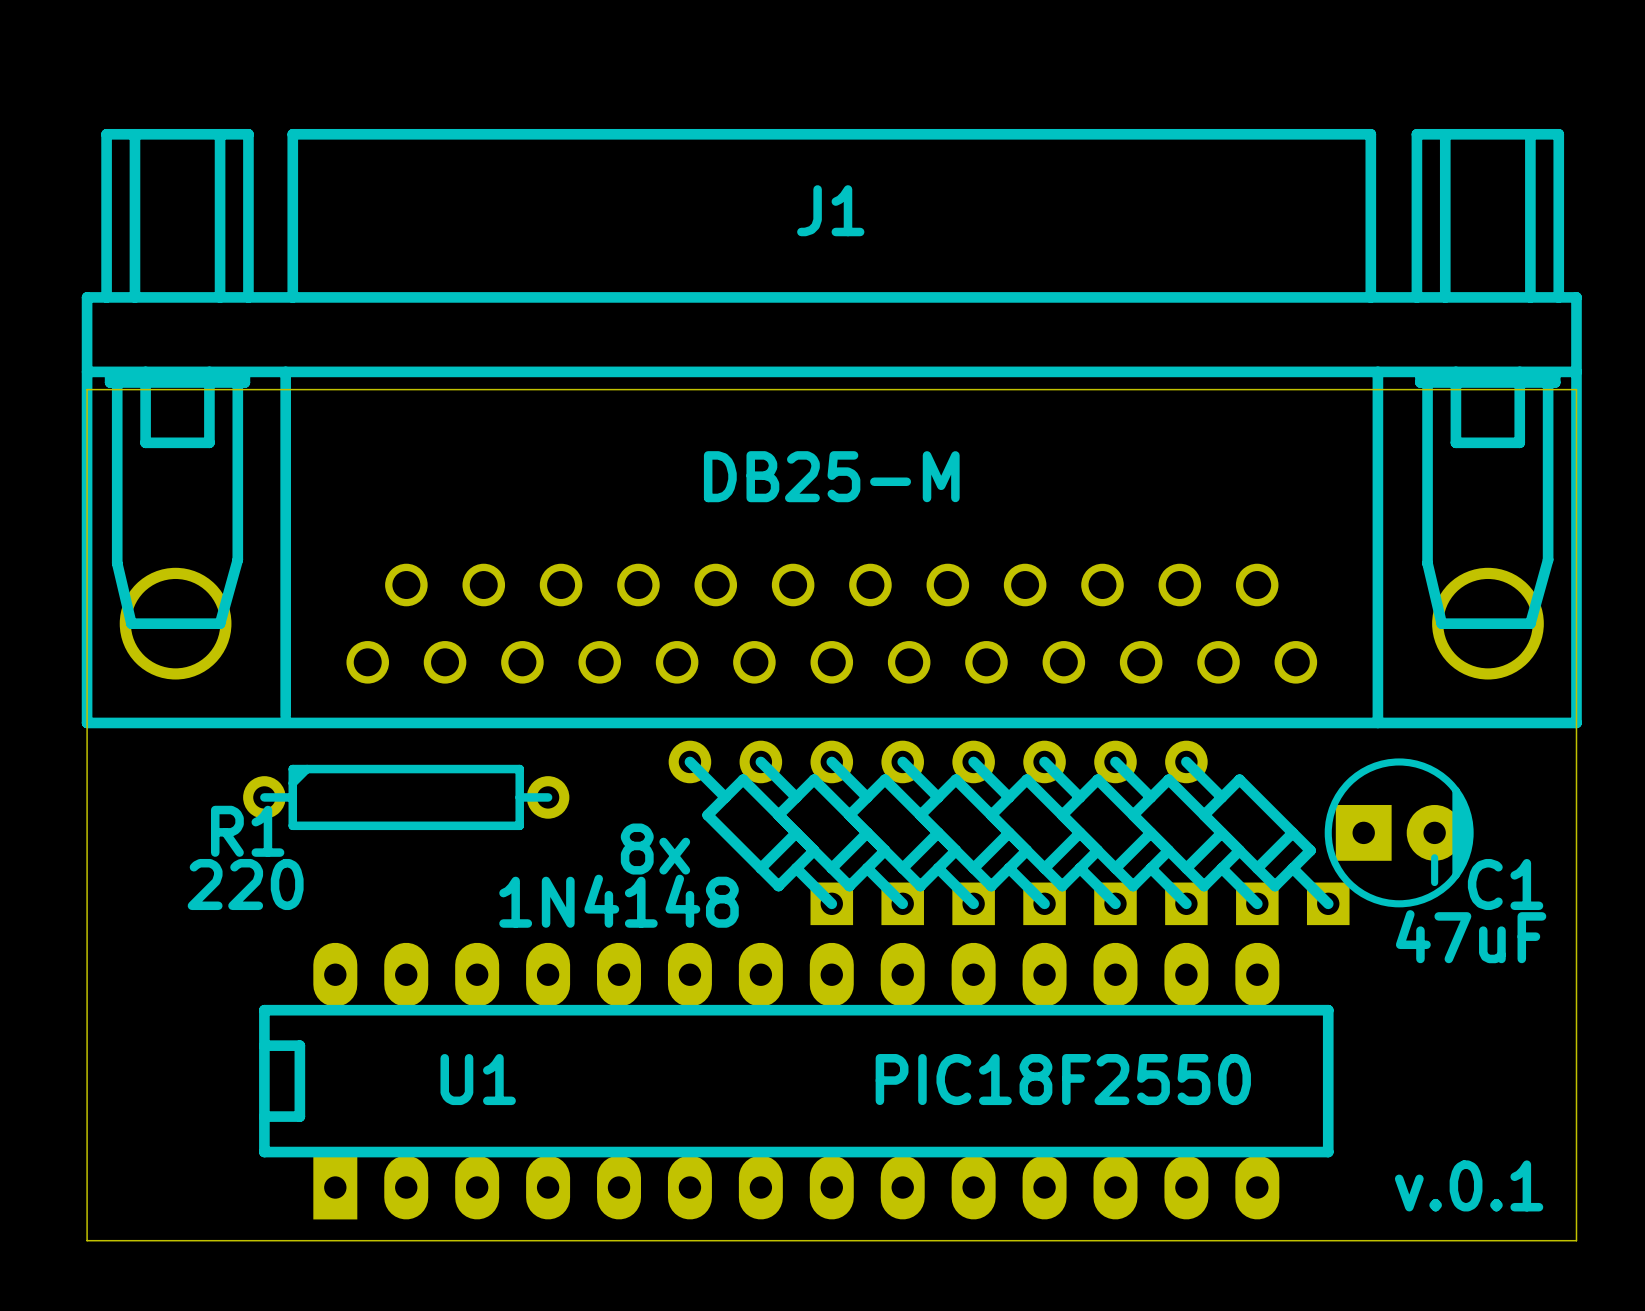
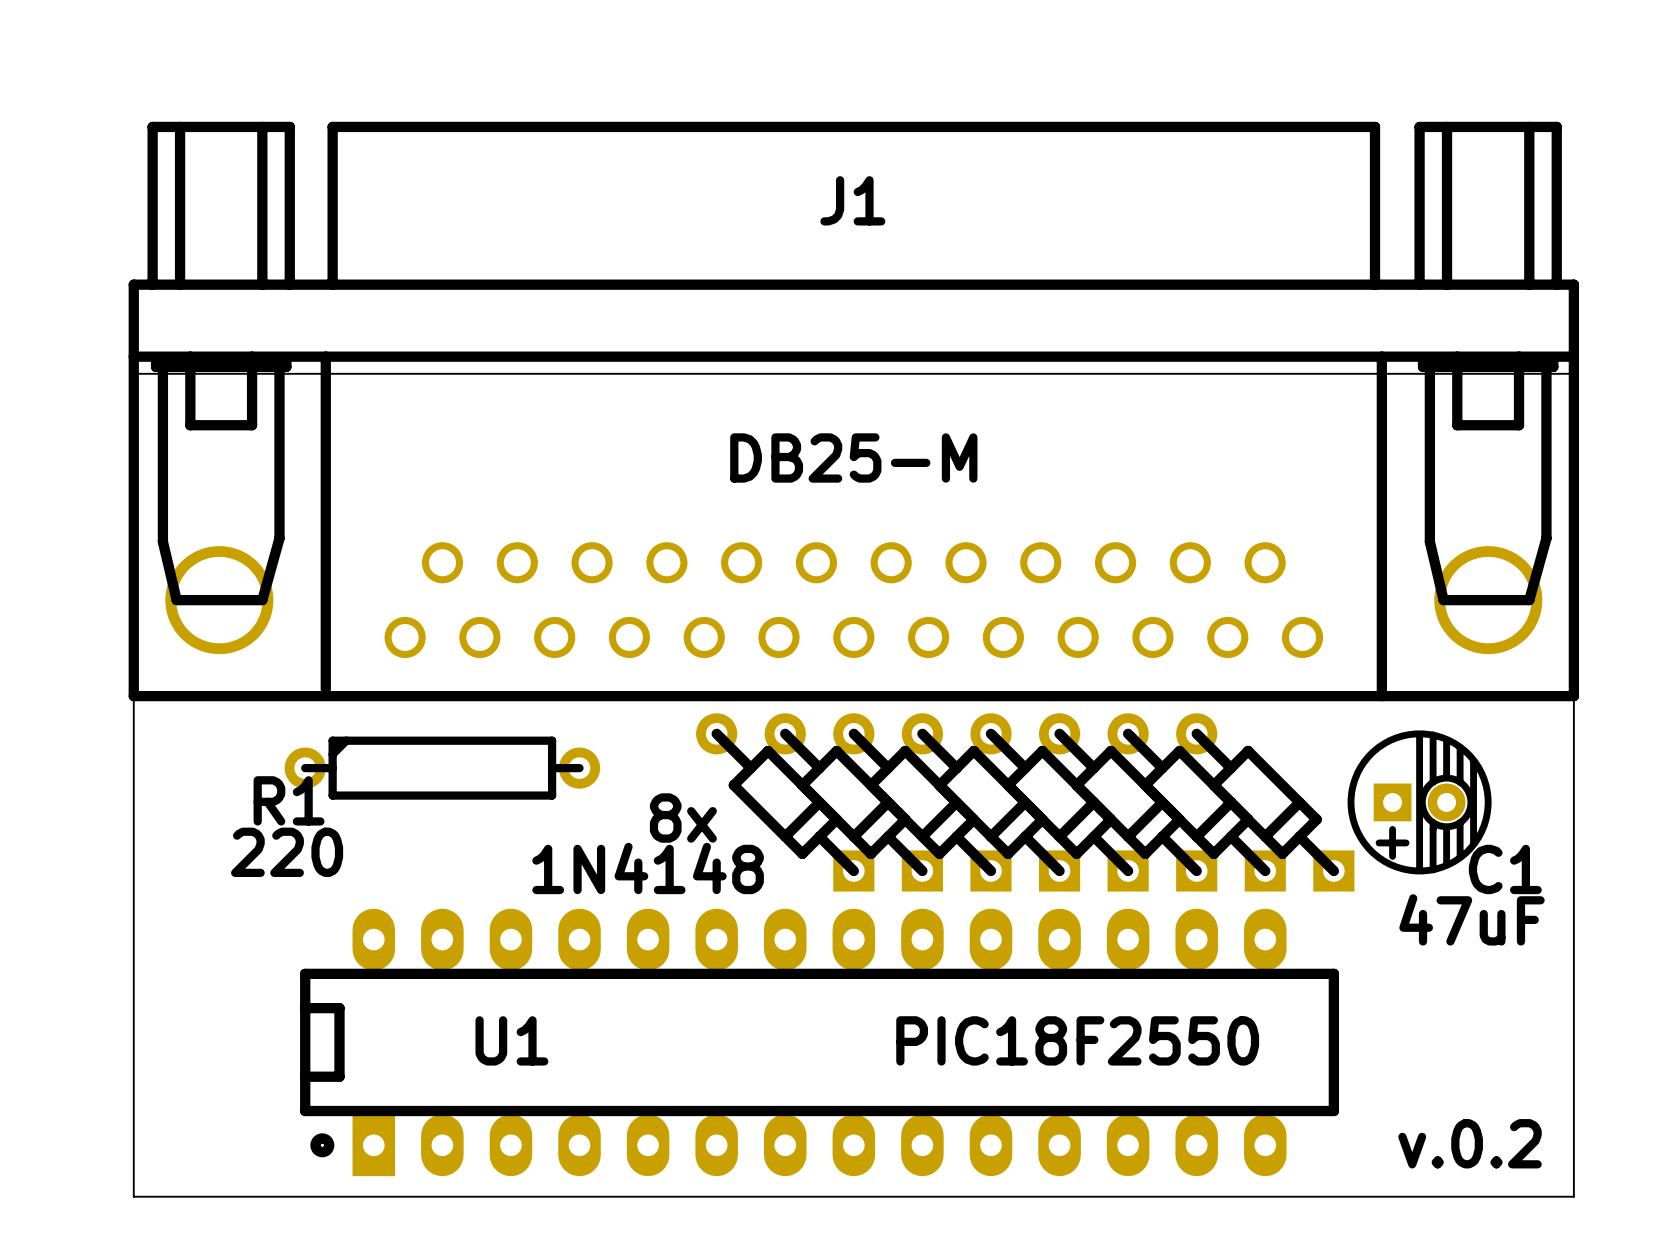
C1 footprint: [1324, 758, 1474, 908] -> [1347, 730, 1492, 875]
drawing: none -> [310, 1133, 335, 1158]
text: v.0.1 (1469, 1185) -> v.0.2 (1470, 1143)

